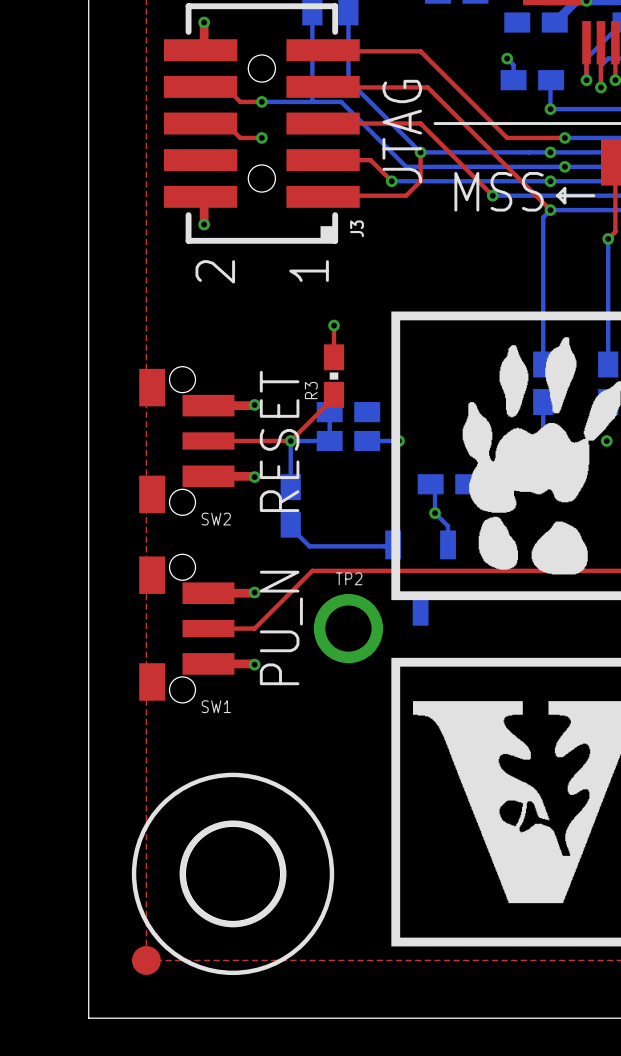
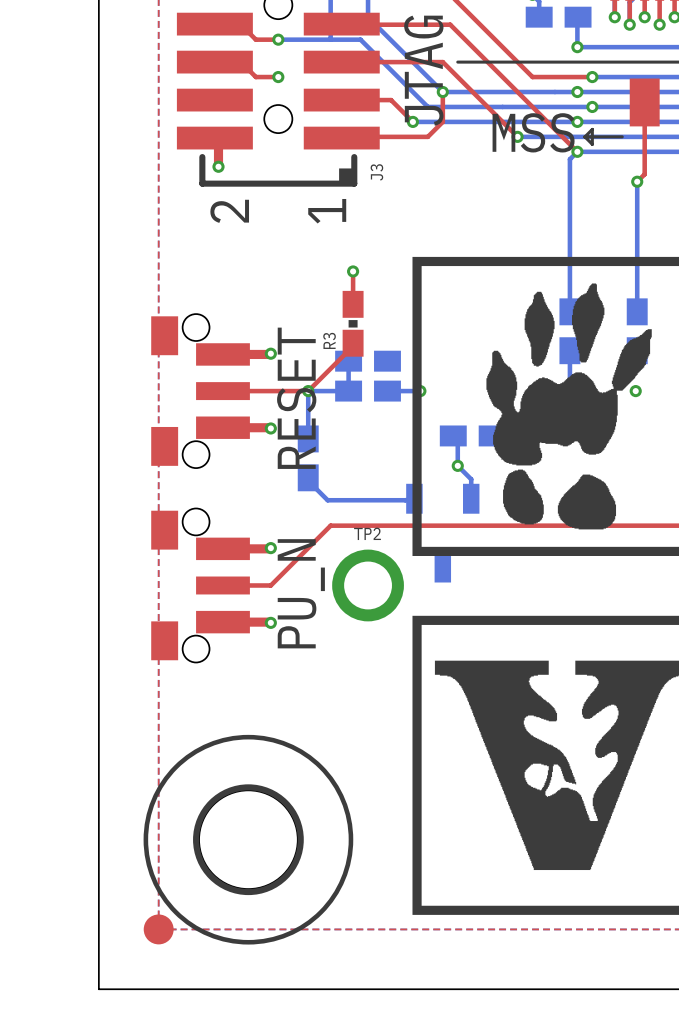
SW2 name: SW2 (216, 519) -> none
SW1 name: SW1 (216, 706) -> none

